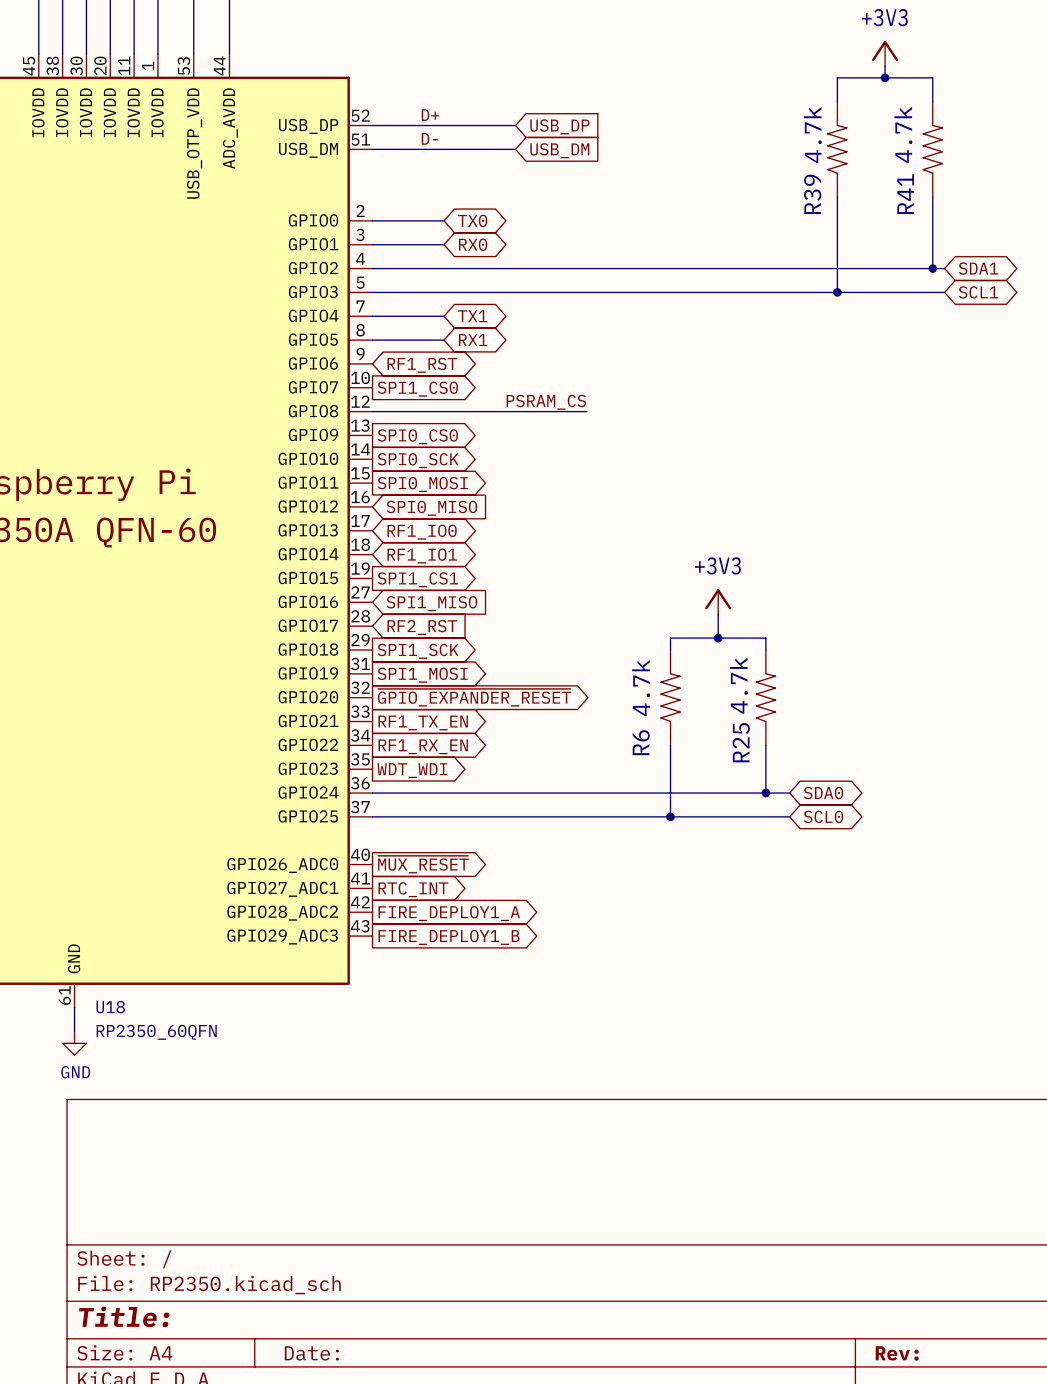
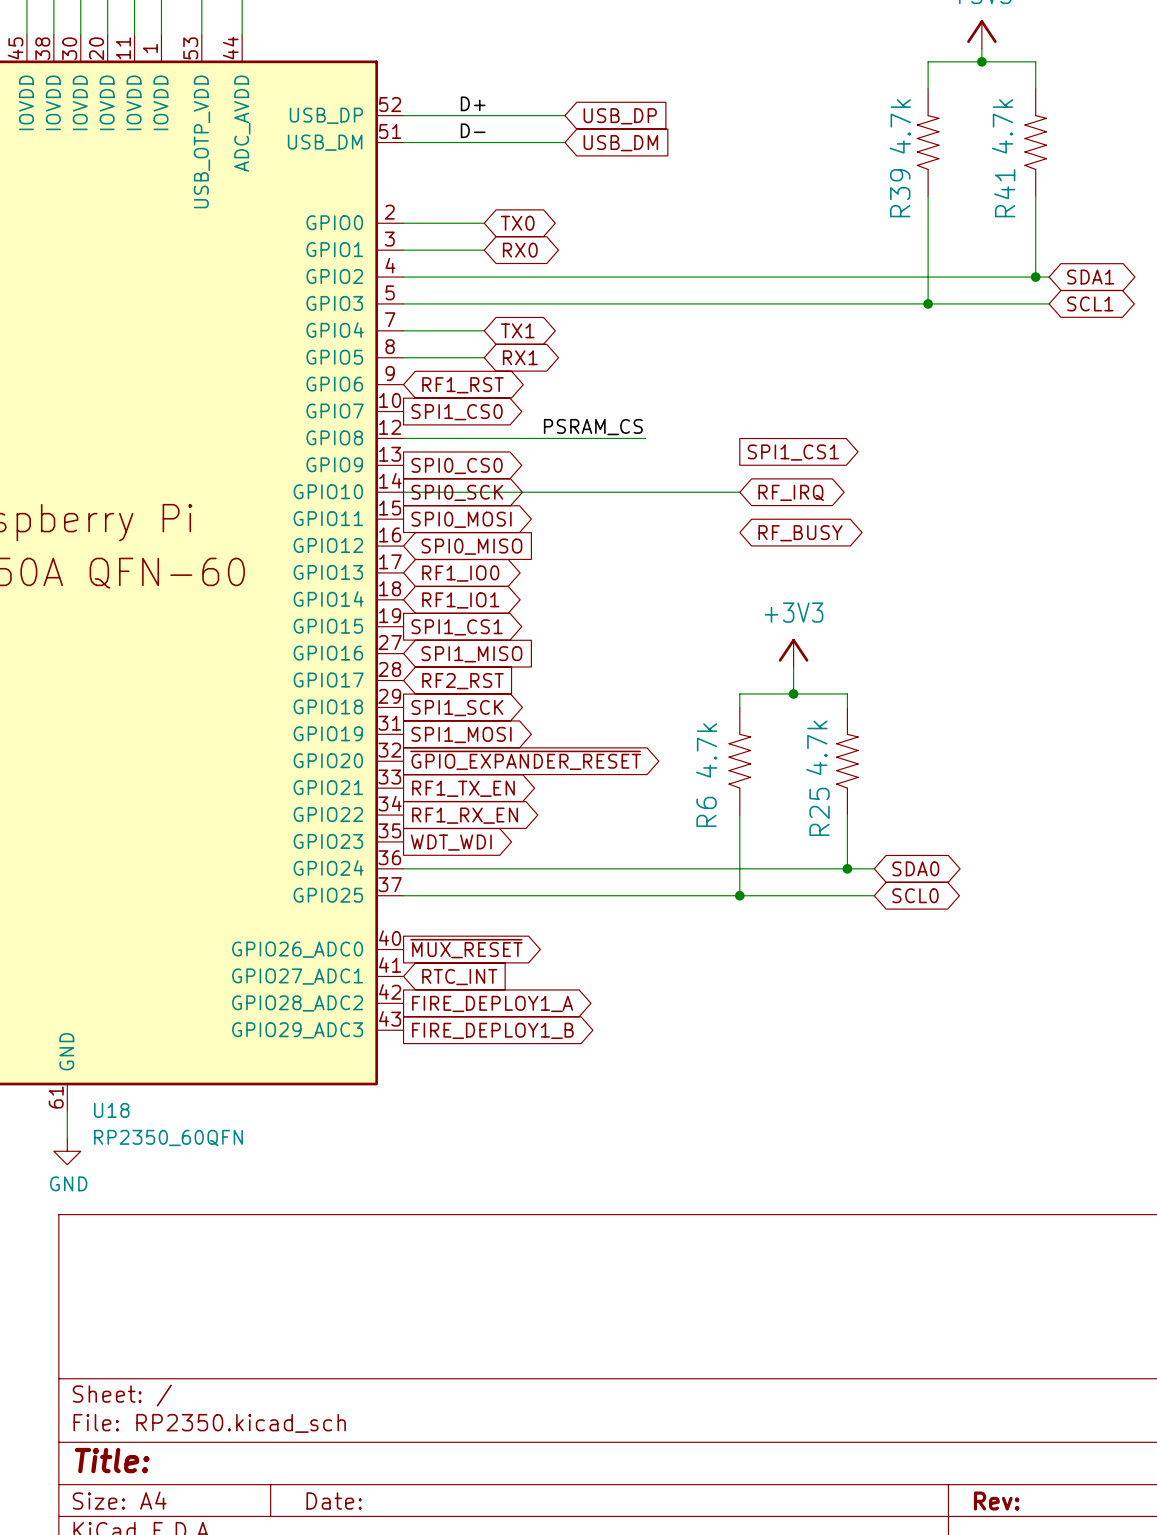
global label: none -> SPI1_CS1 (793, 452)
wire: none -> (403, 492) (739, 492)
global label: none -> RF_IRQ (791, 492)
global label: none -> RF_BUSY (800, 533)
global label shape: output (413, 889) -> input (459, 977)

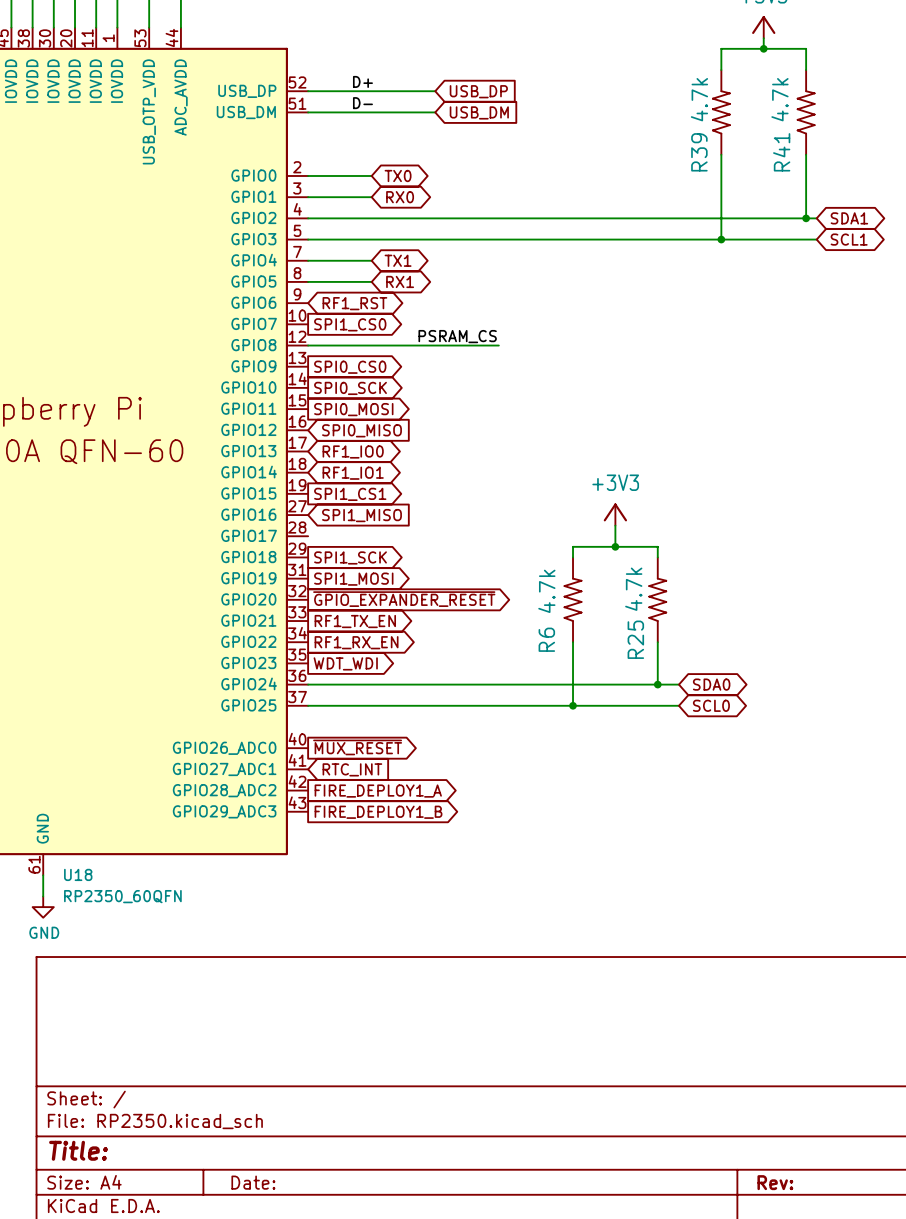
global label: SPI1_CS1 (793, 452) -> none
wire: (403, 492) (739, 492) -> none
global label: RF_IRQ (791, 492) -> none
global label: RF_BUSY (800, 533) -> none
global label: RF2_RST (462, 681) -> none

